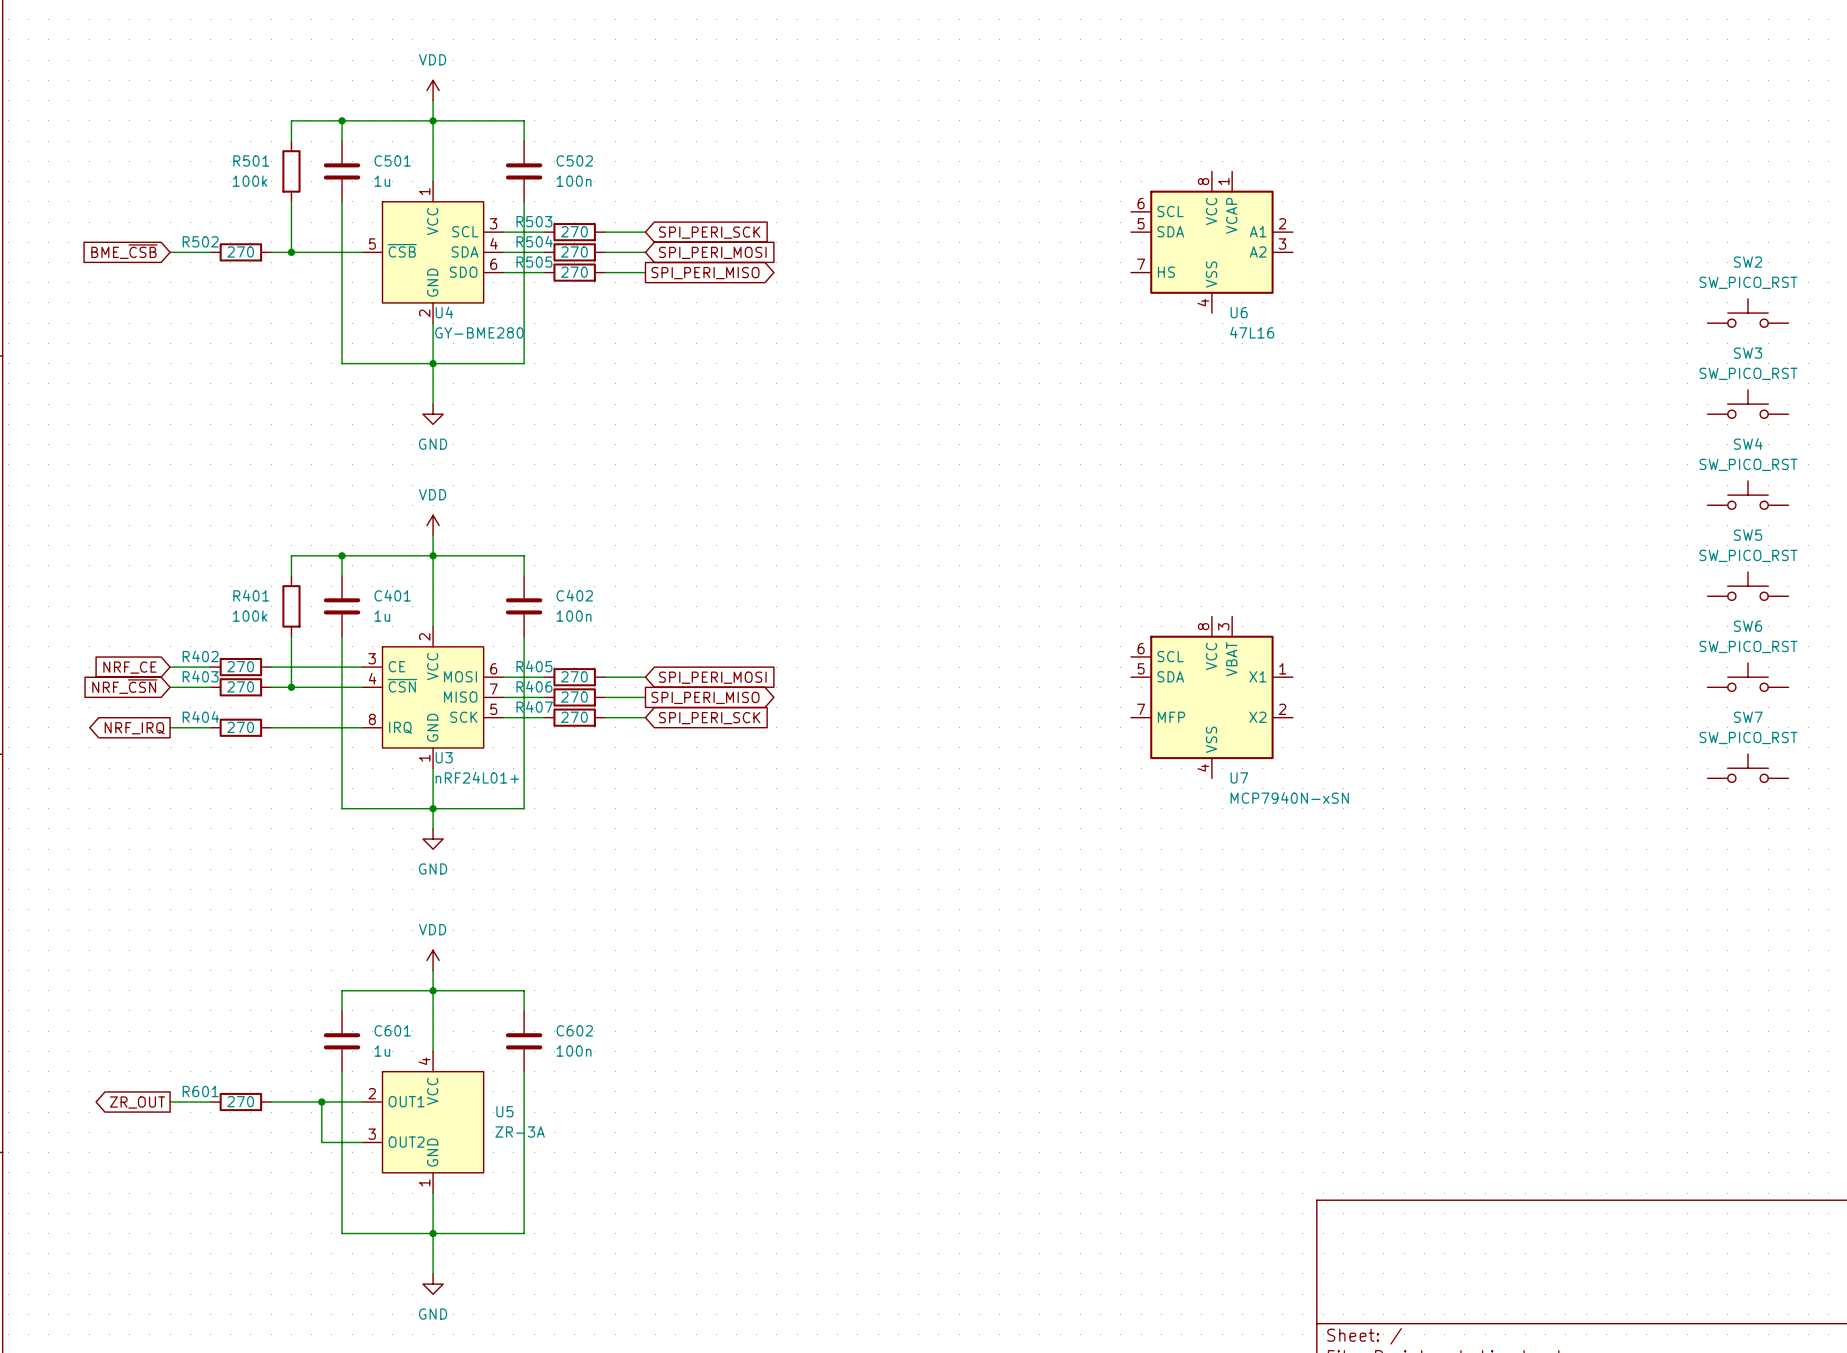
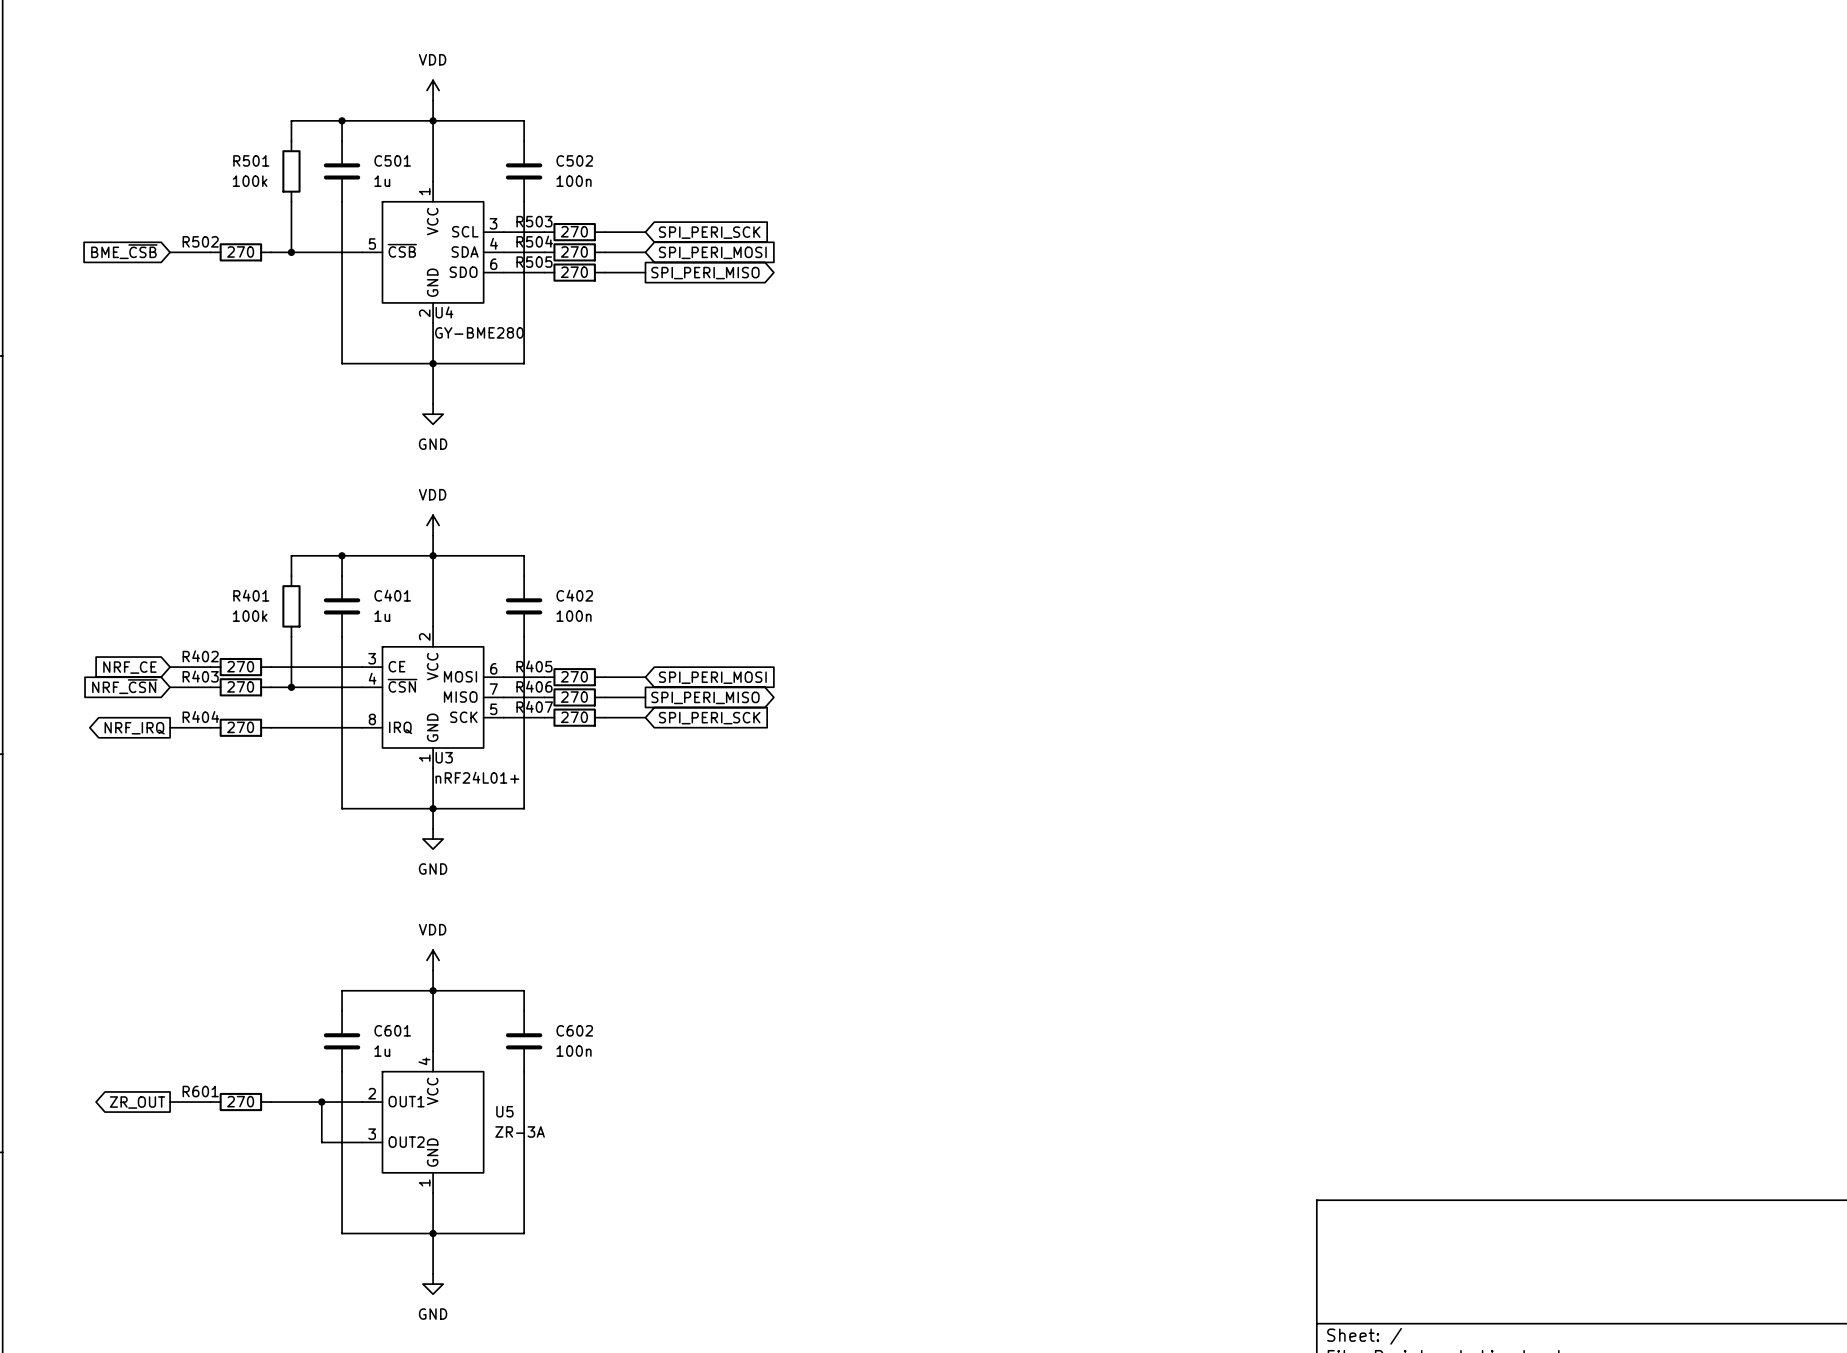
U6: 47L16 (1211, 242) -> none
SW2: SW_PICO_RST (1748, 313) -> none
SW3: SW_PICO_RST (1748, 404) -> none
SW4: SW_PICO_RST (1748, 495) -> none
SW5: SW_PICO_RST (1748, 586) -> none
SW6: SW_PICO_RST (1748, 677) -> none
U7: MCP7940N-xSN (1211, 697) -> none
SW7: SW_PICO_RST (1748, 768) -> none

